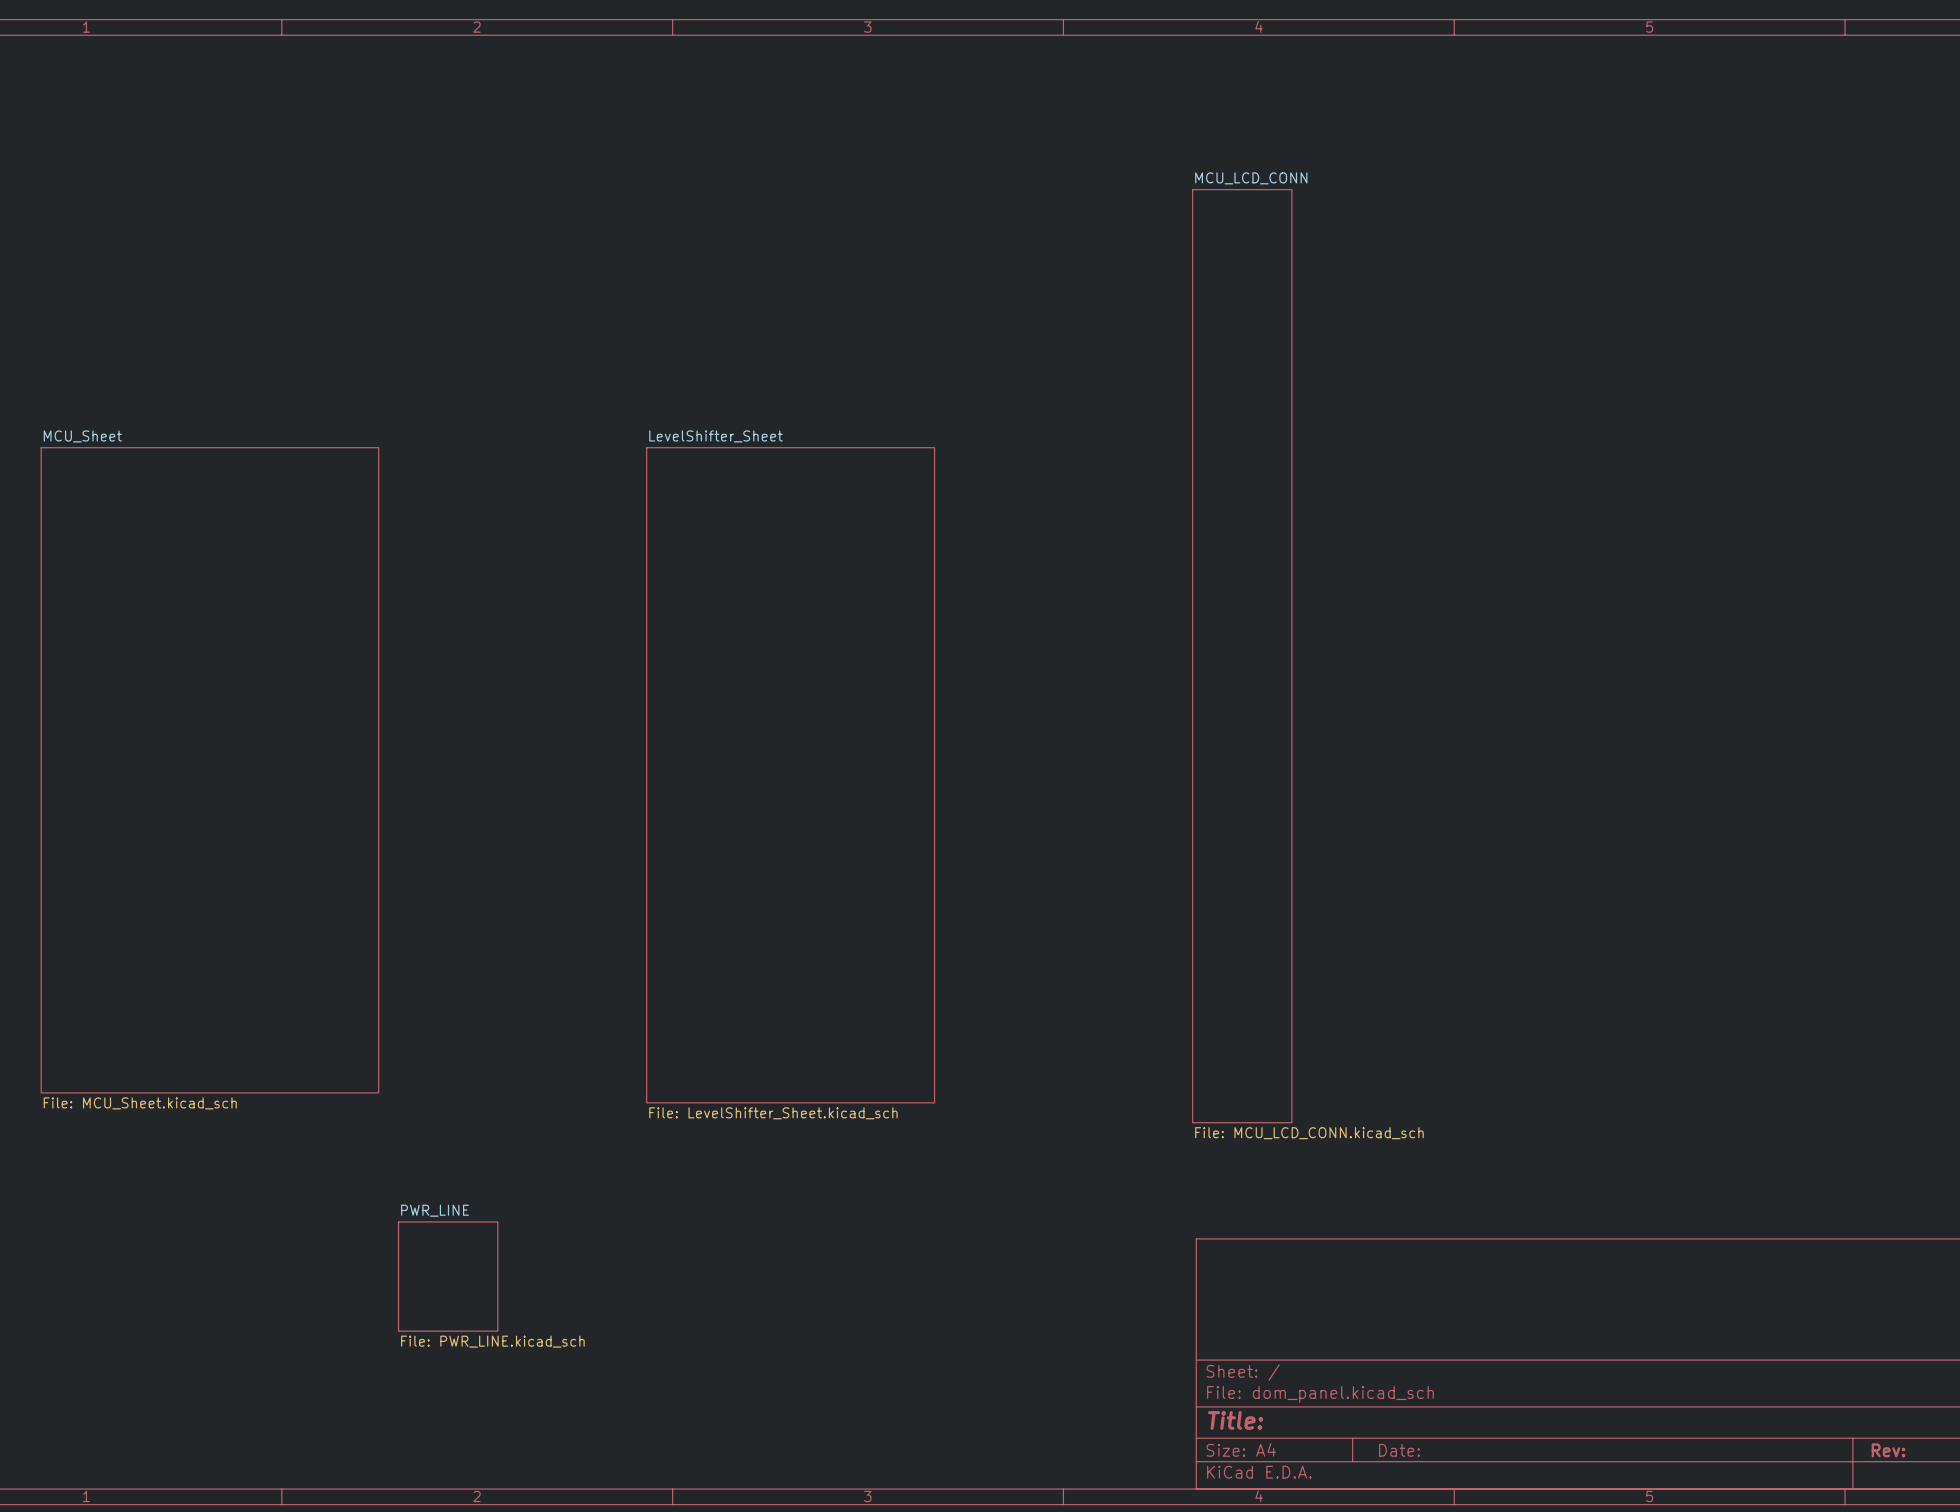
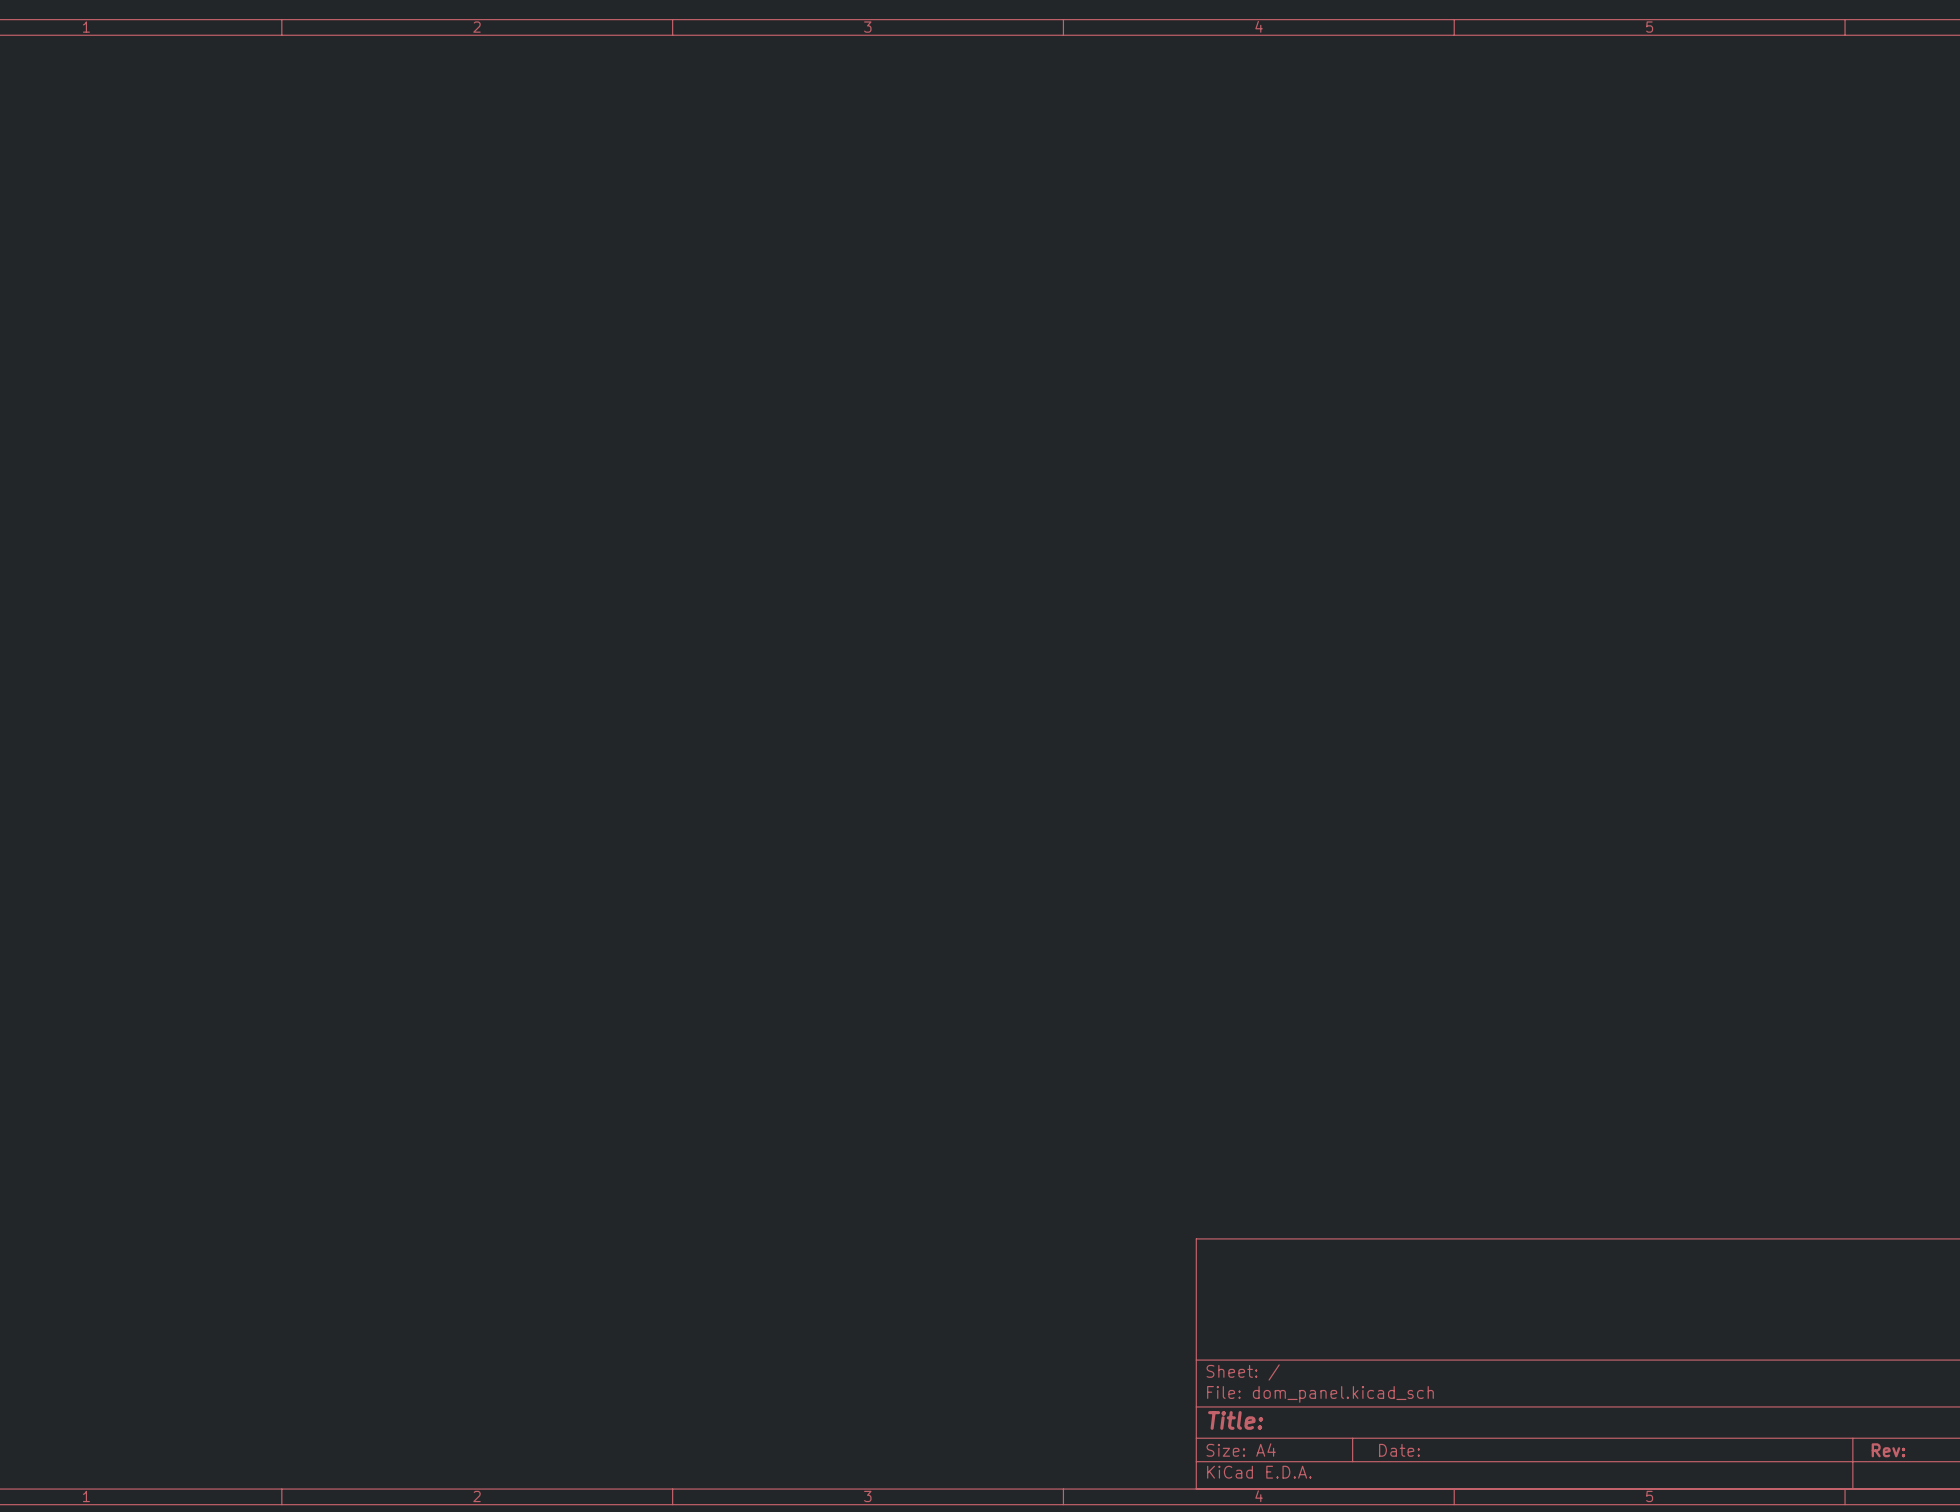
sheet MCU_LCD_CONN: File: MCU_LCD_CONN.kicad_sch (1242, 656) -> none
sheet MCU_Sheet: File: MCU_Sheet.kicad_sch (209, 770) -> none
sheet LevelShifter_Sheet: File: LevelShifter_Sheet.kicad_sch (790, 775) -> none
sheet PWR_LINE: File: PWR_LINE.kicad_sch (448, 1276) -> none

